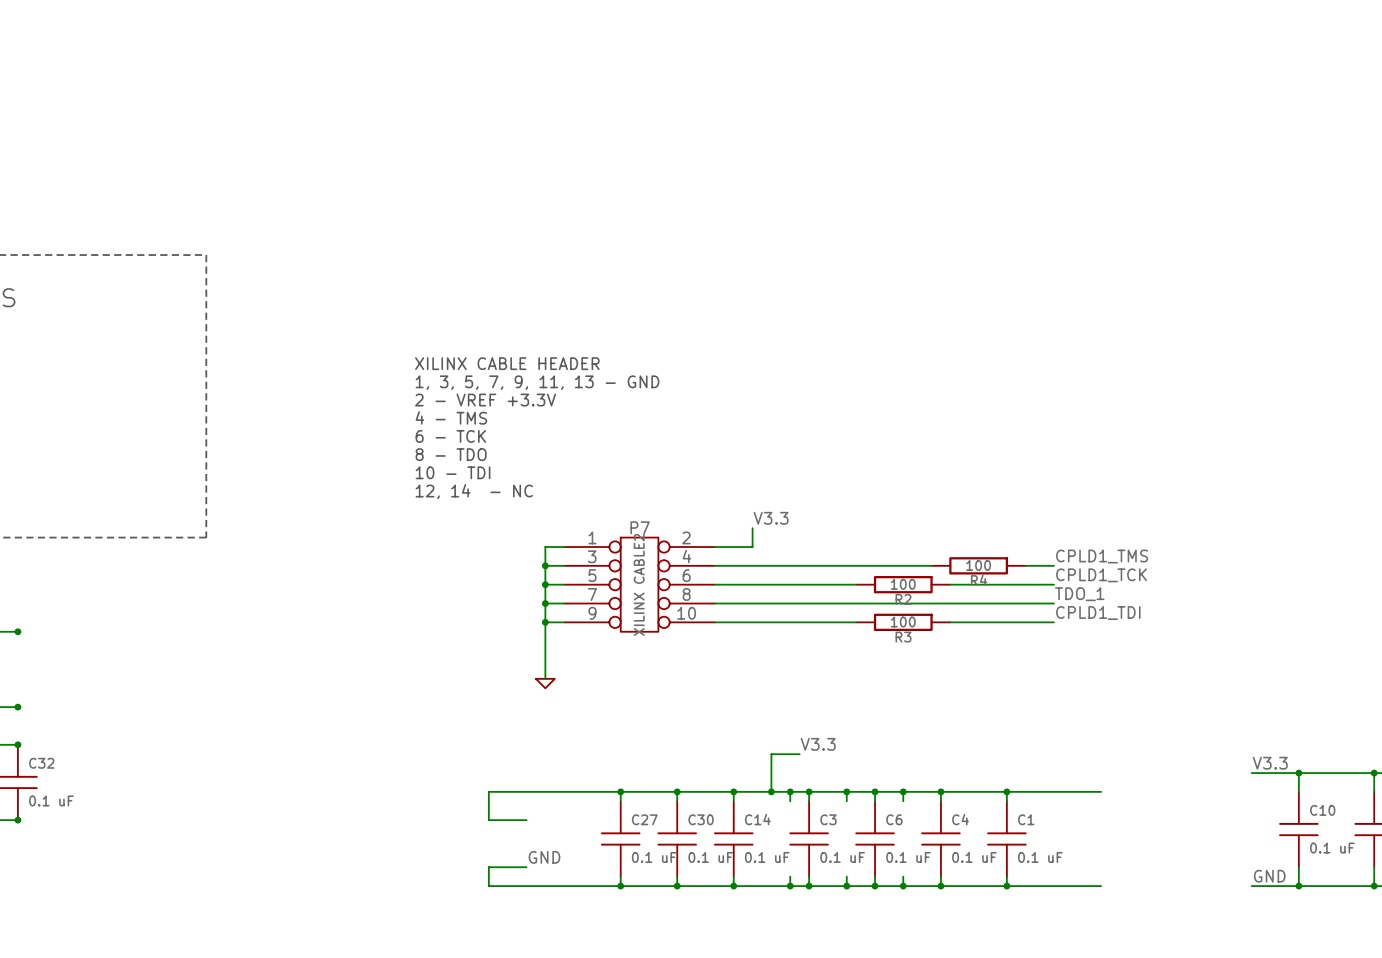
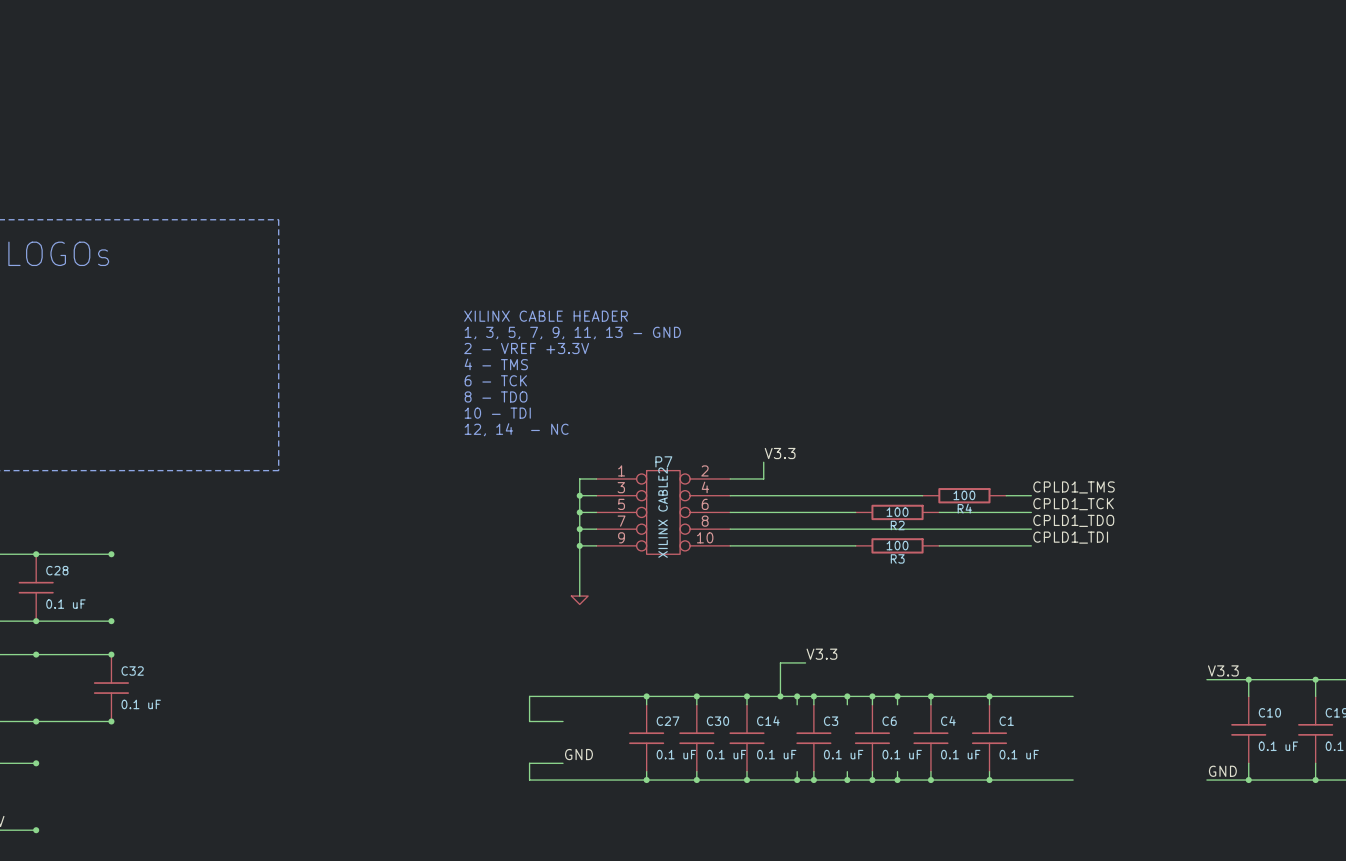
label: TDO_1 (1079, 594) -> CPLD1_TDO (1073, 520)

